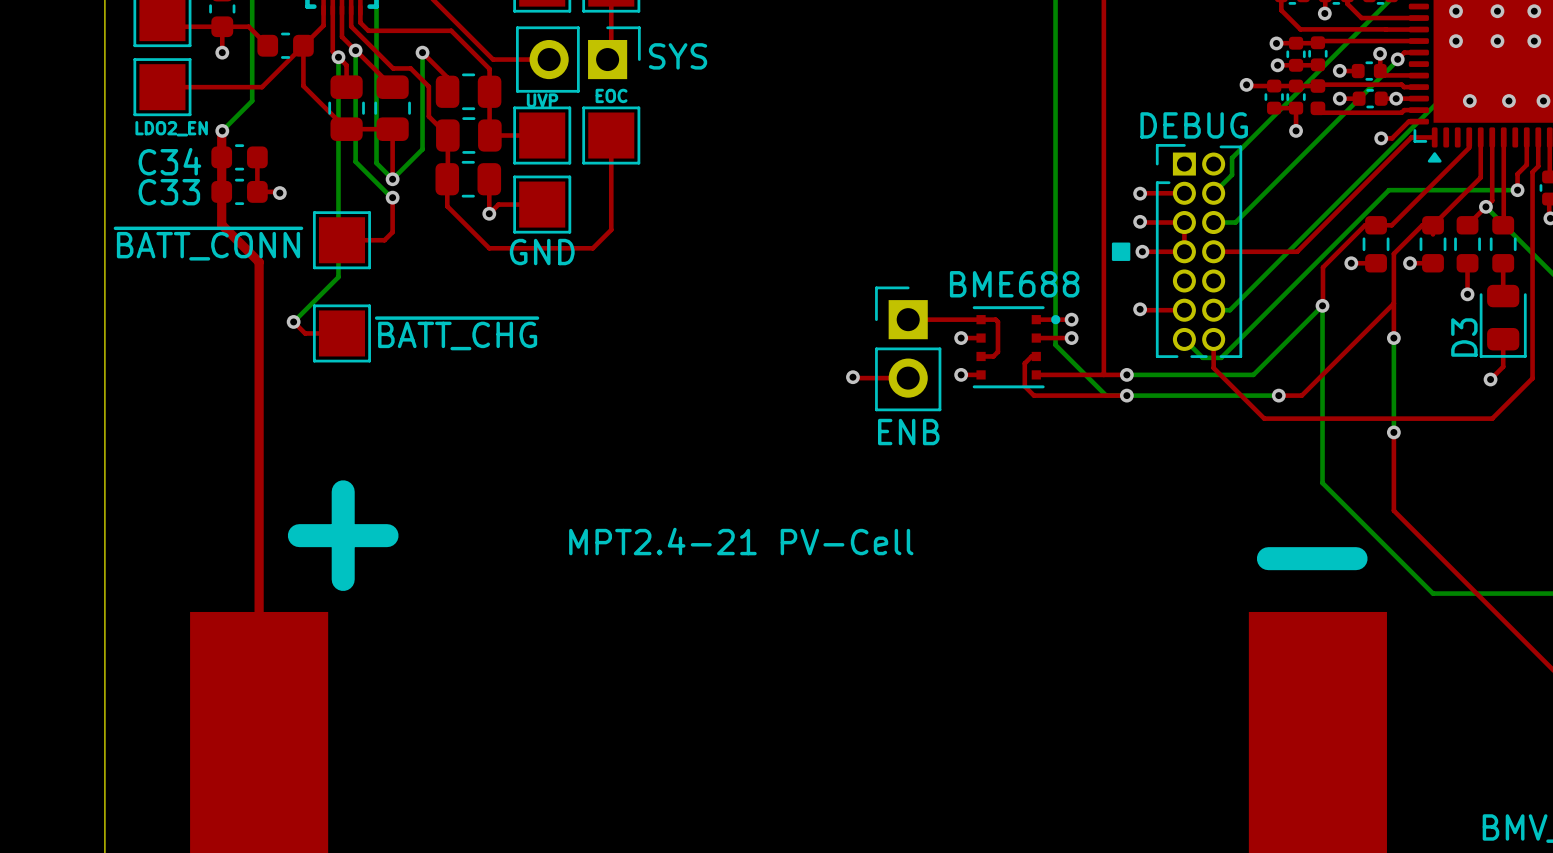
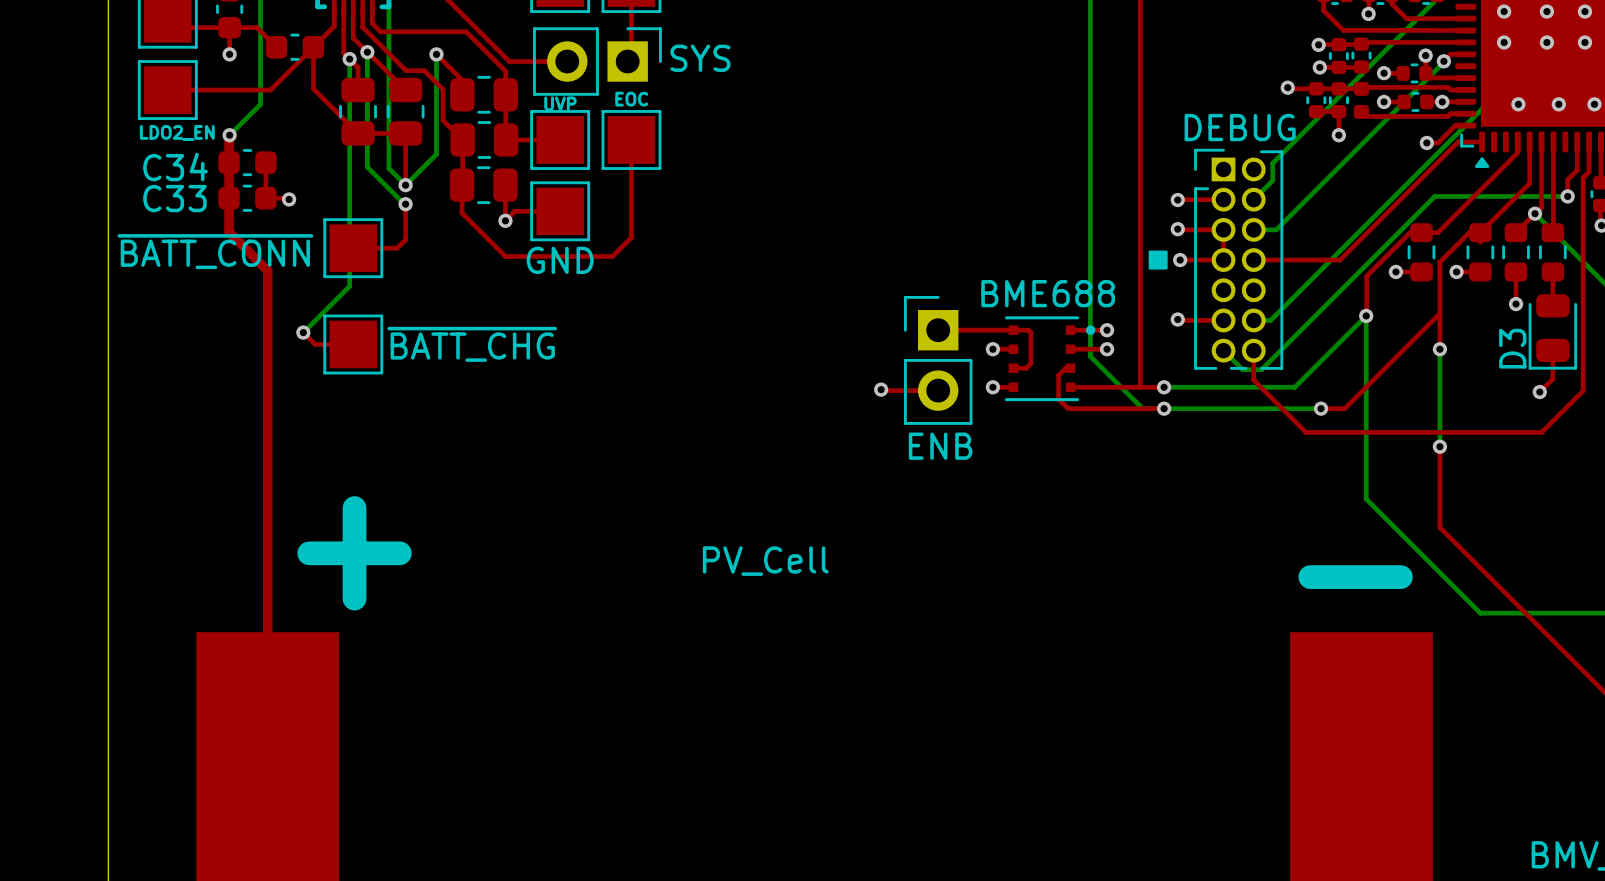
text: none -> DEBUG (1240, 127)
part value: DEBUG (1194, 125) -> none
text: none -> ENB (940, 446)
part value: ENB (908, 432) -> none
part value: MPT2.4-21 PV-Cell (741, 541) -> PV_Cell (765, 561)

